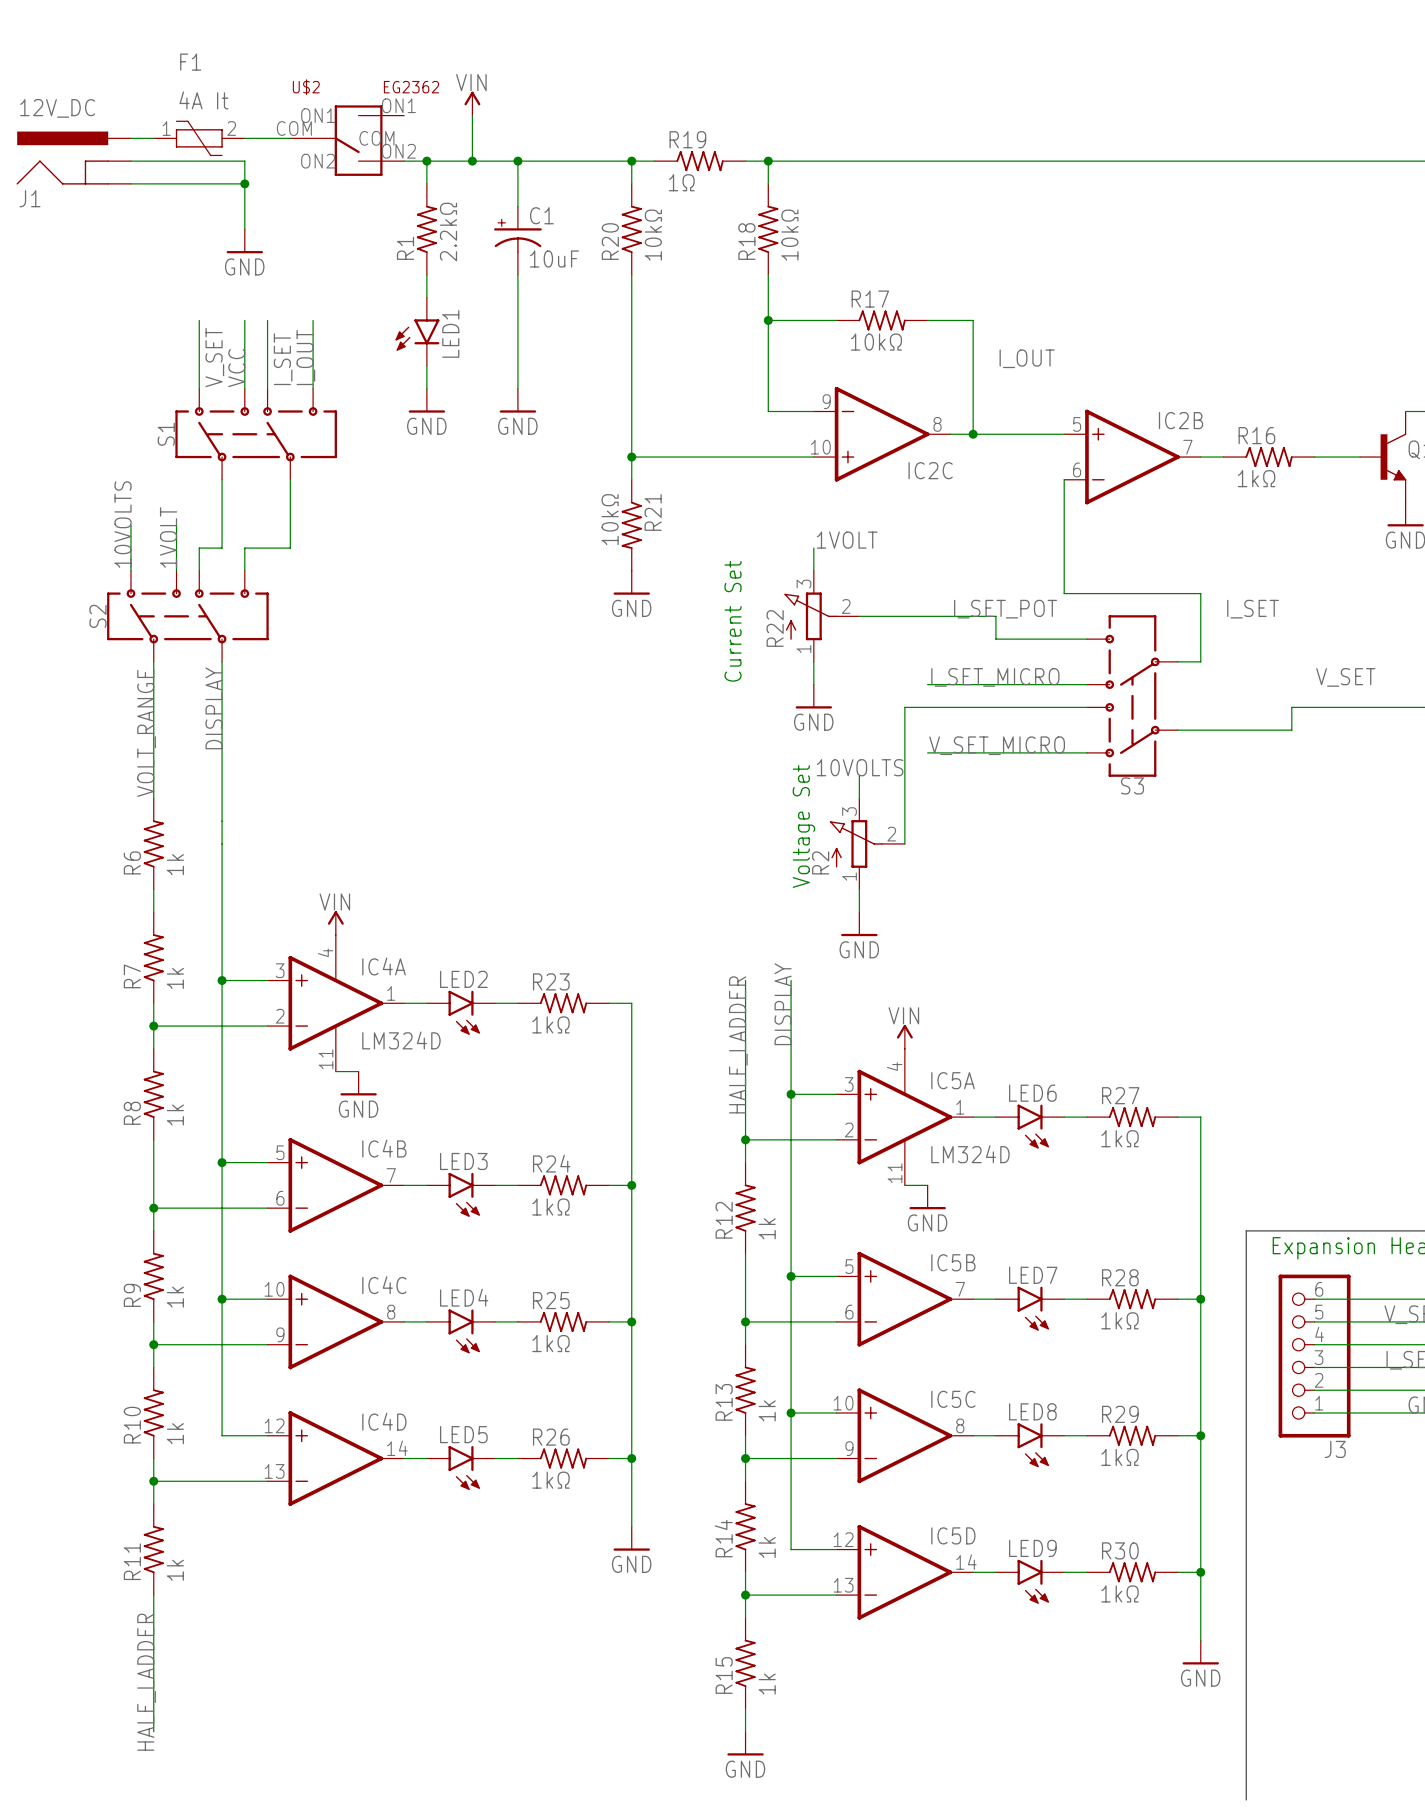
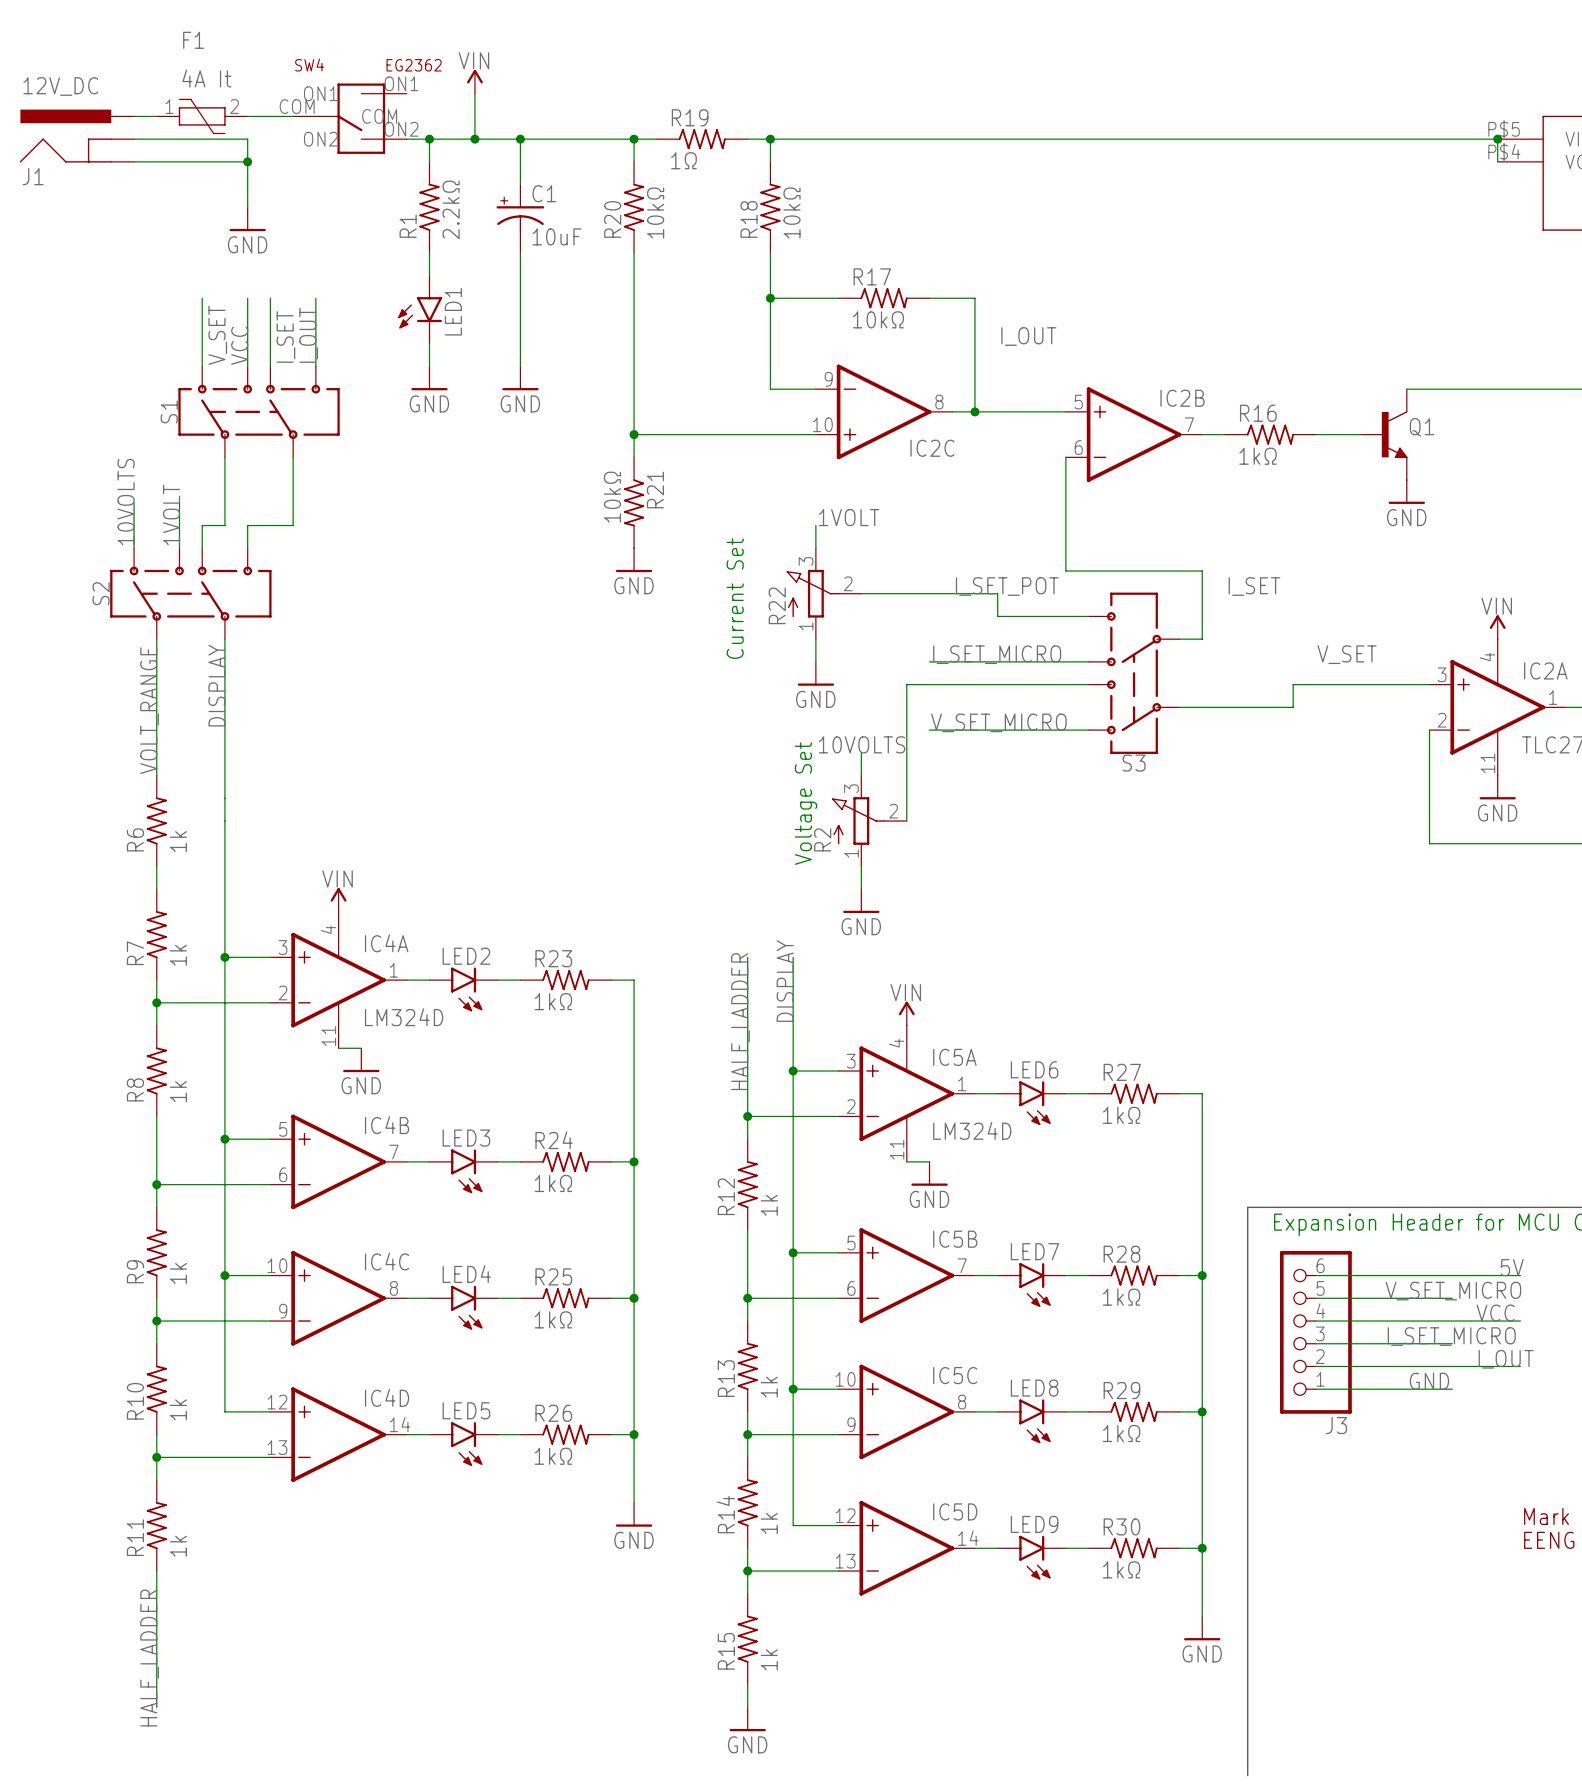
U$2 name: U$2 (306, 87) -> SW4 (309, 65)

